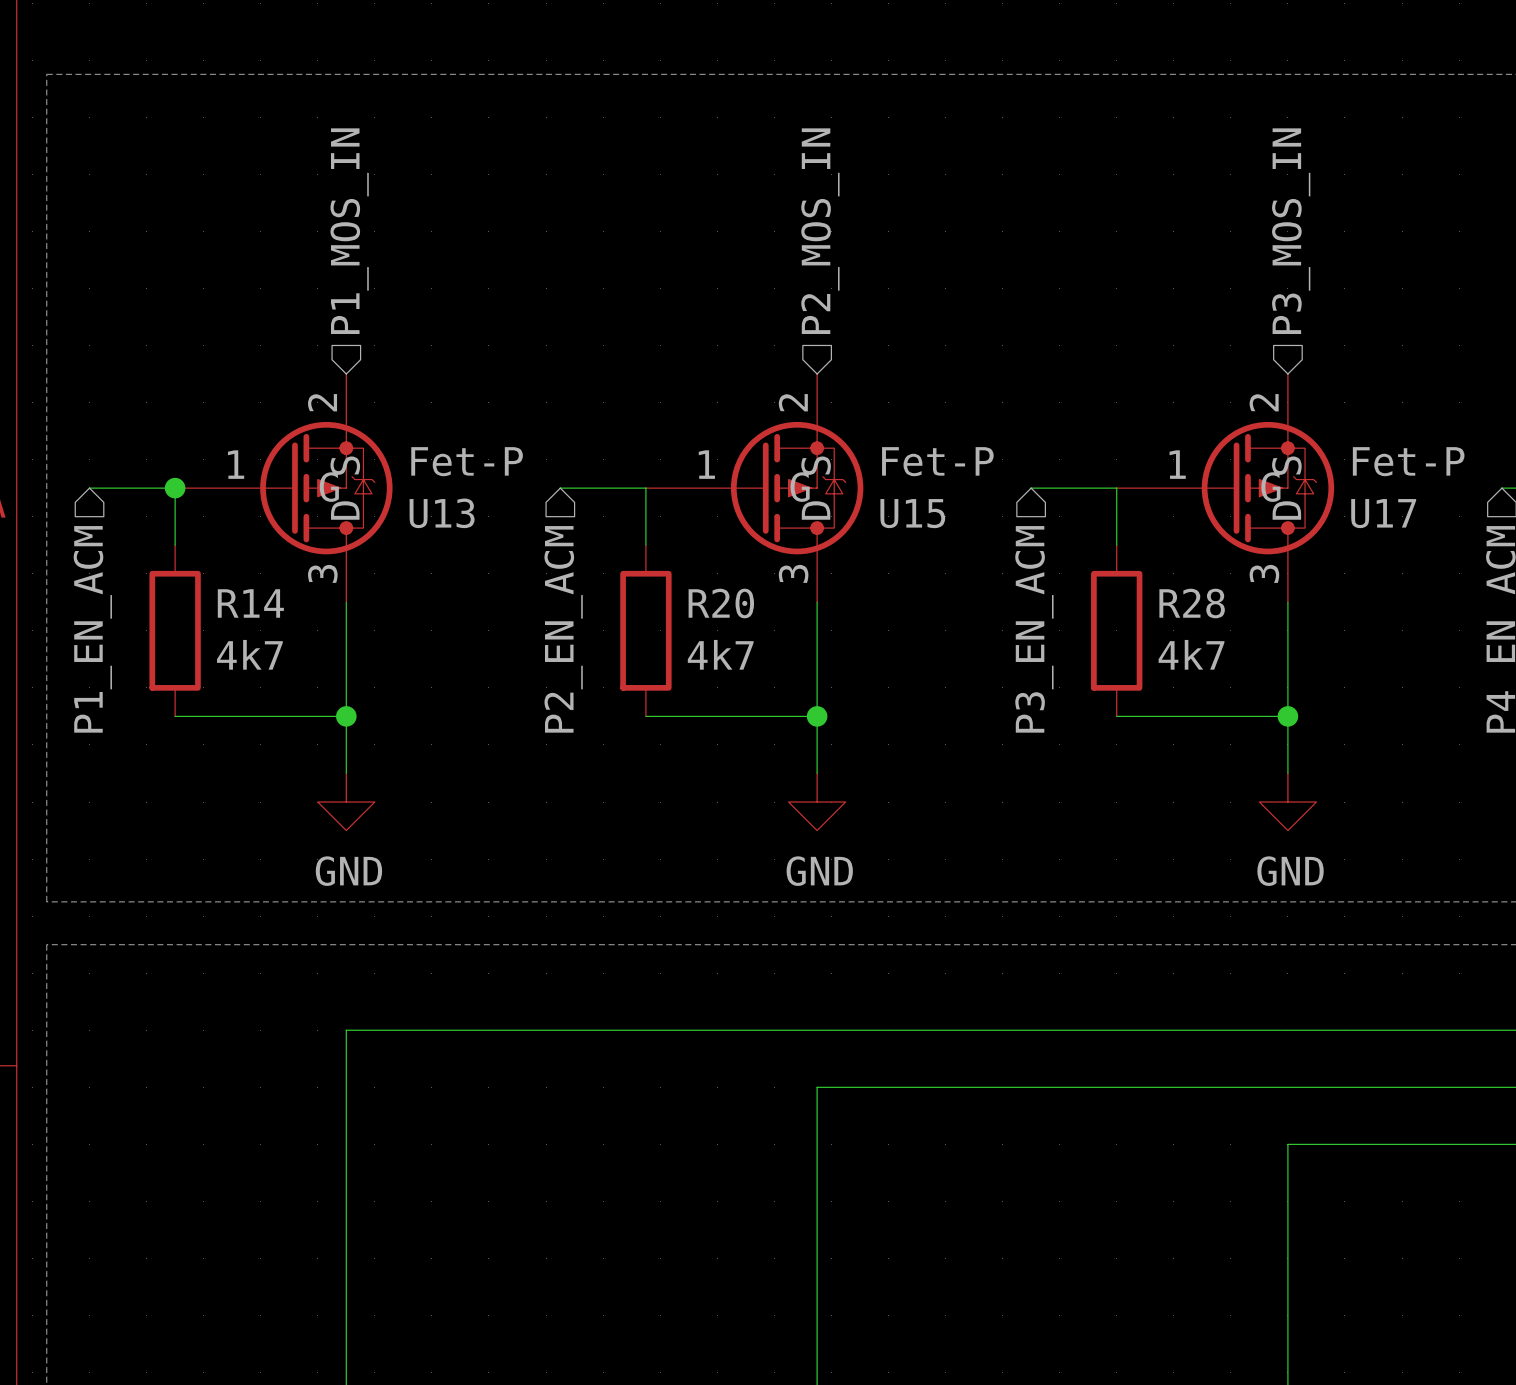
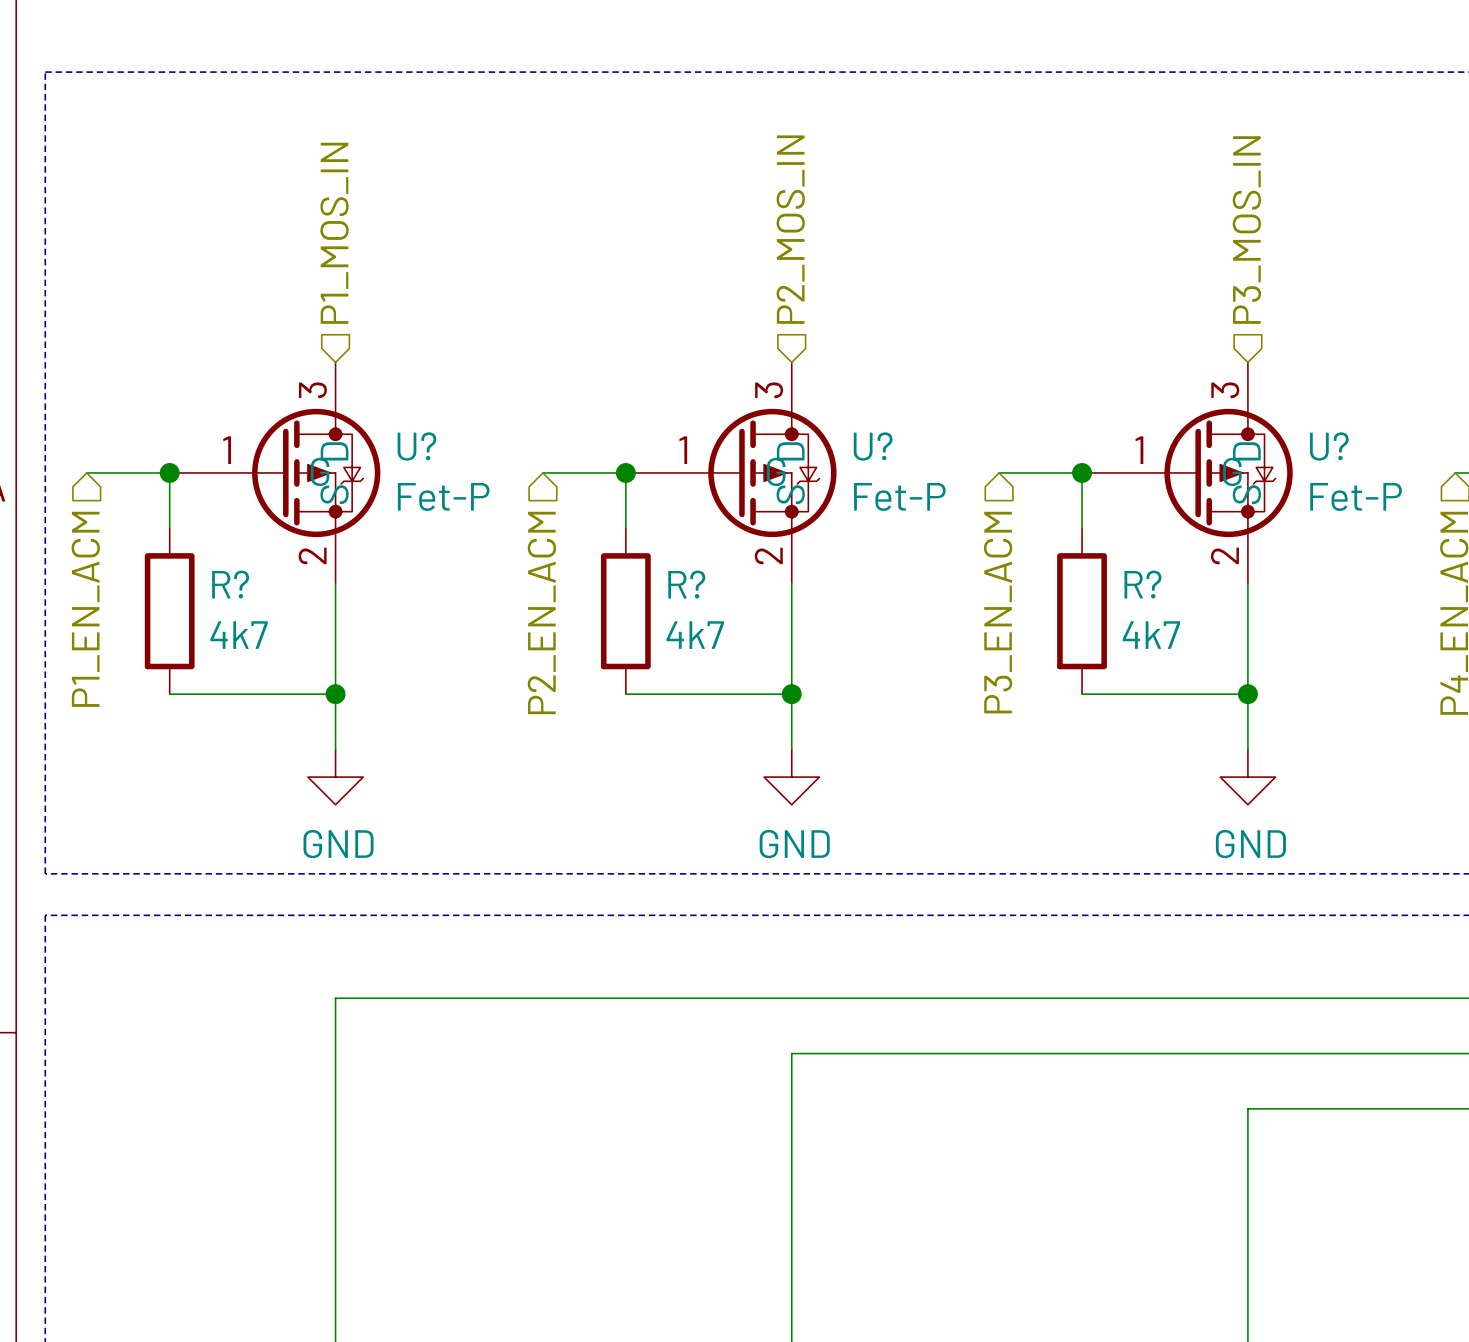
U13: Fet-P (283, 488) -> none
U?: none -> Fet-P (275, 472)
junction: none -> (625, 472)
U15: Fet-P (754, 488) -> none
U?: none -> Fet-P (731, 472)
junction: none -> (1082, 472)
U17: Fet-P (1225, 488) -> none
U?: none -> Fet-P (1187, 472)
R14 name: R14 (250, 603) -> R? (230, 584)
R20 name: R20 (721, 603) -> R? (686, 584)
R28 name: R28 (1192, 603) -> R? (1142, 584)

